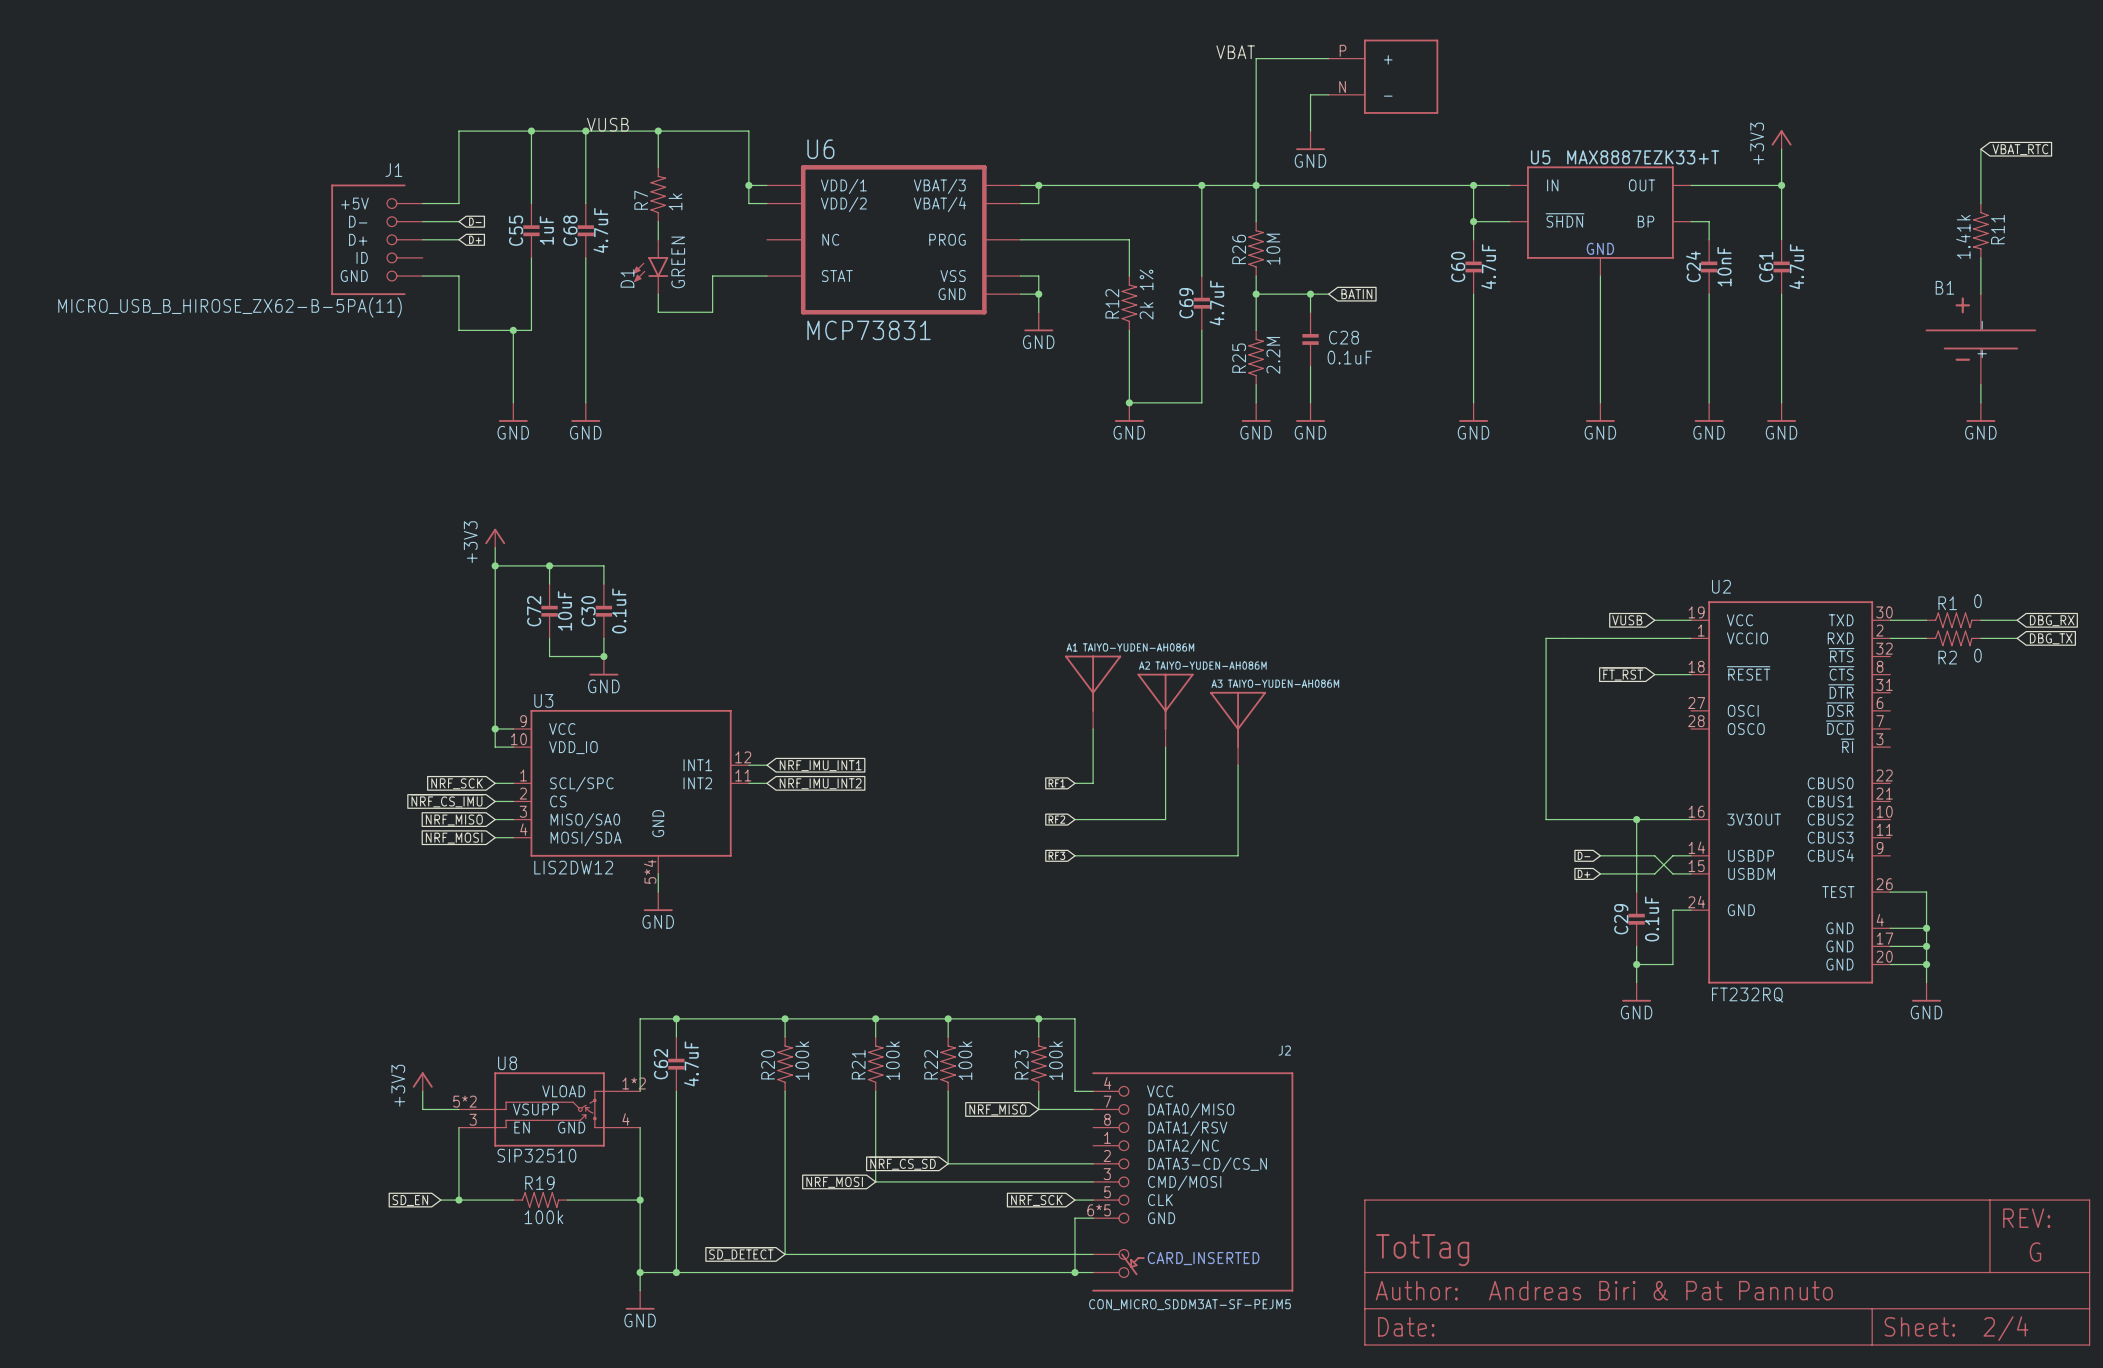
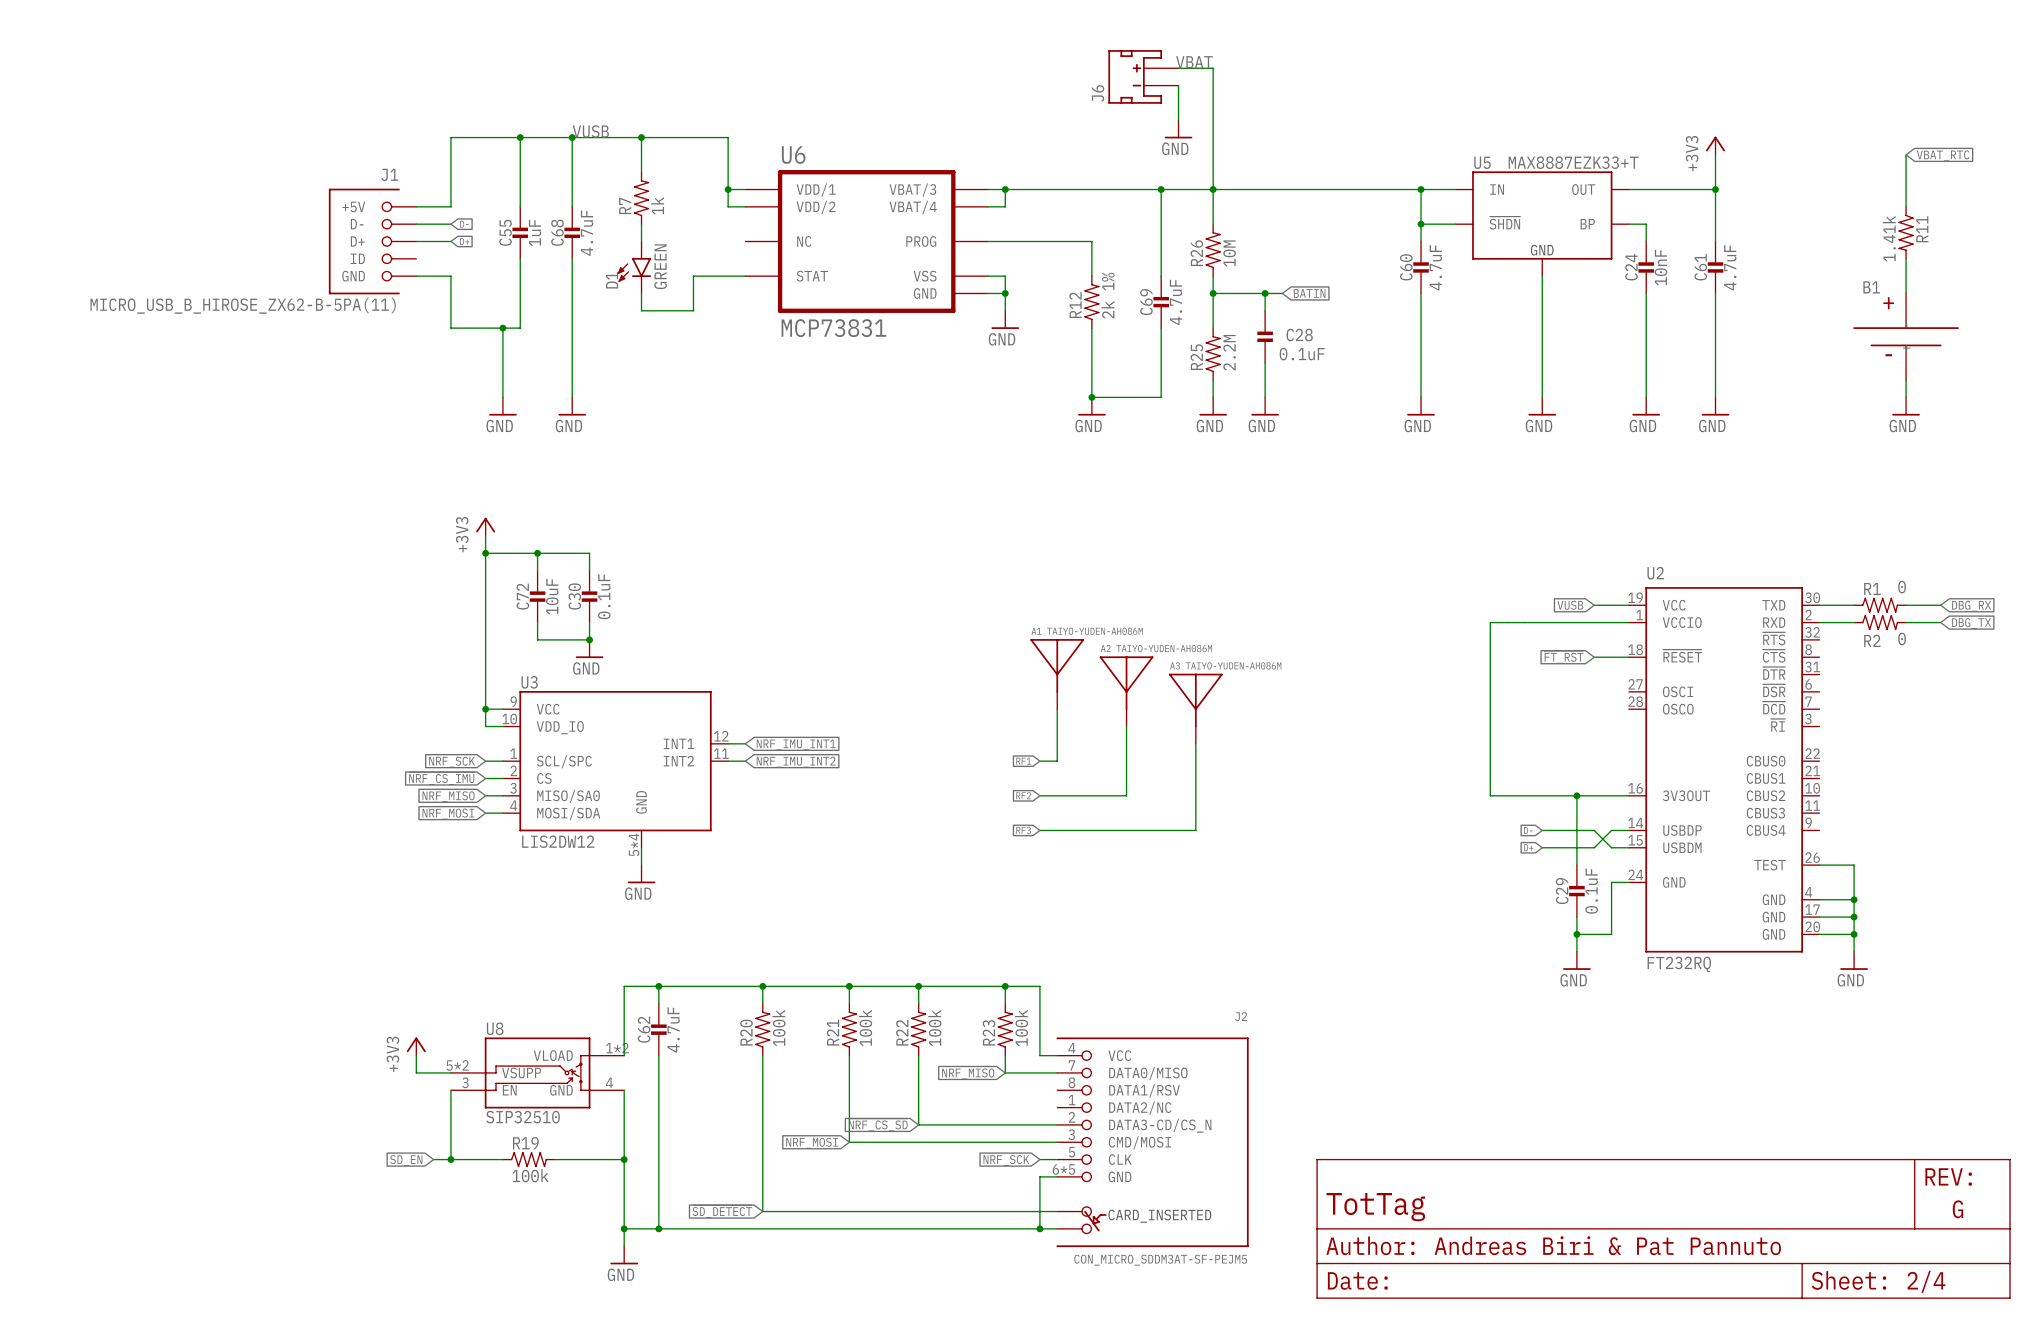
wire: (1256, 58) (1328, 58) -> (1213, 68) (1178, 68)
J6: none -> (1143, 76)
wire: none -> (1178, 85) (1178, 120)
part: (1383, 76) -> none
wire: (1328, 94) (1310, 94) (1310, 131) -> none
power symbol position: GND (1310, 140) -> GND (1178, 129)

